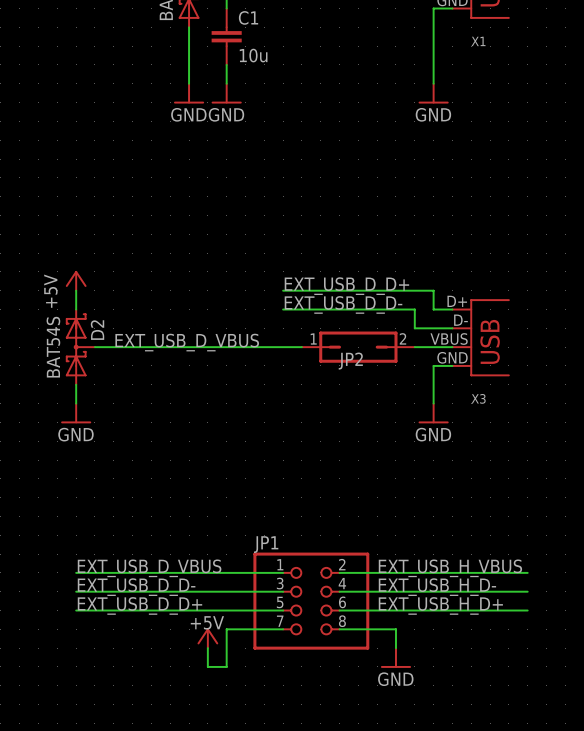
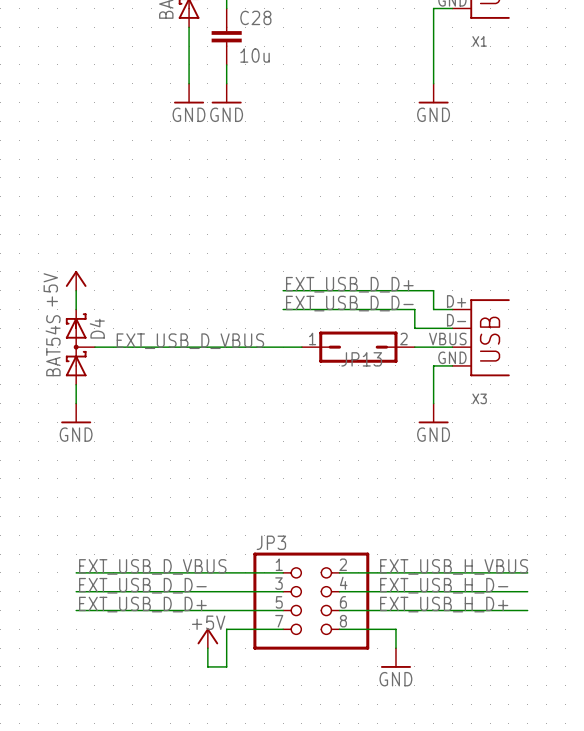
C1 name: C1 (248, 17) -> C28 (255, 17)
D2 name: D2 (97, 330) -> D4 (97, 328)
JP2 name: JP2 (350, 361) -> JP13 (361, 359)
JP1 name: JP1 (266, 544) -> JP3 (271, 542)

